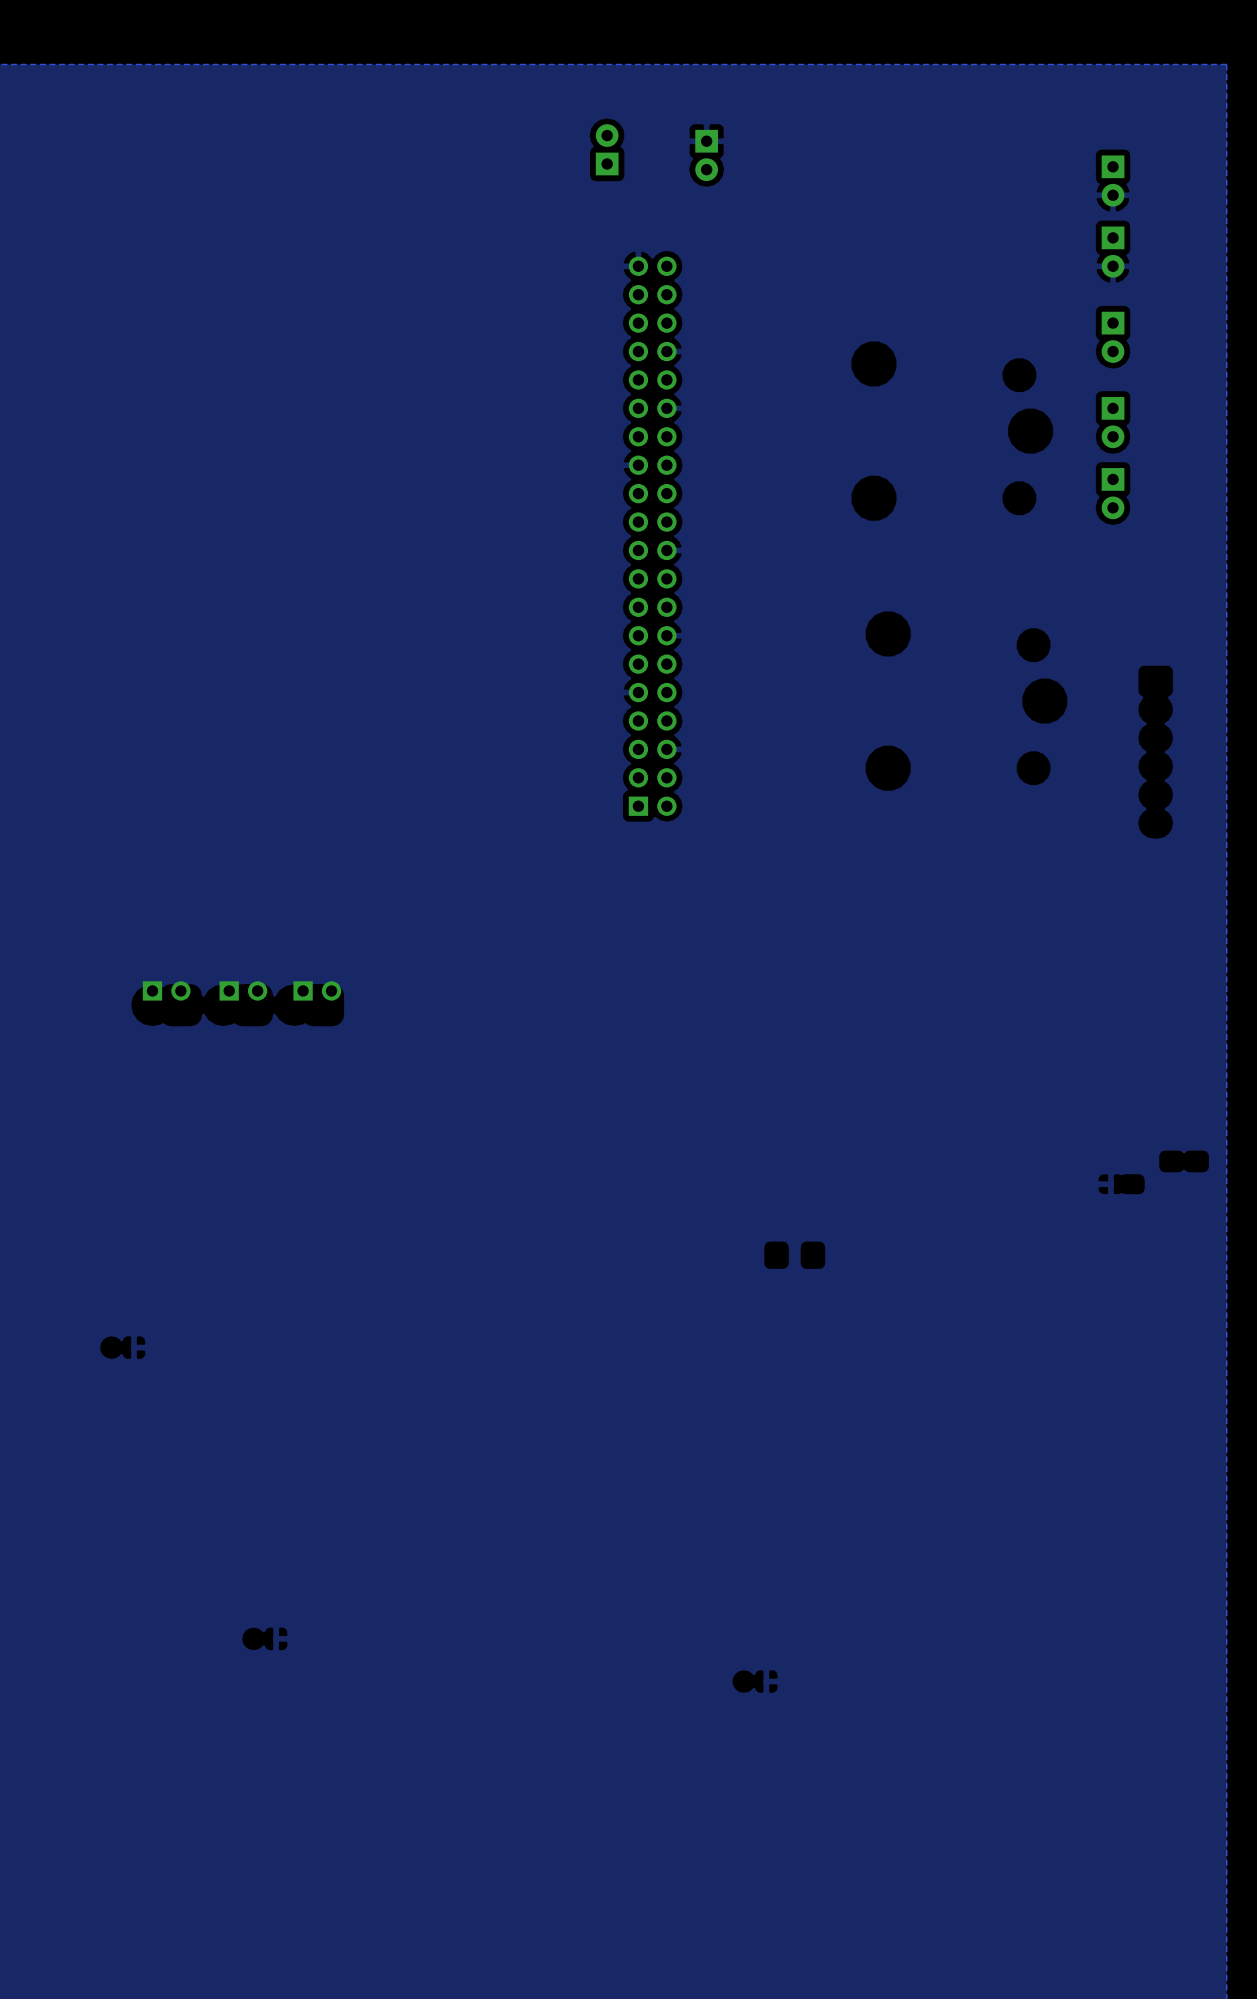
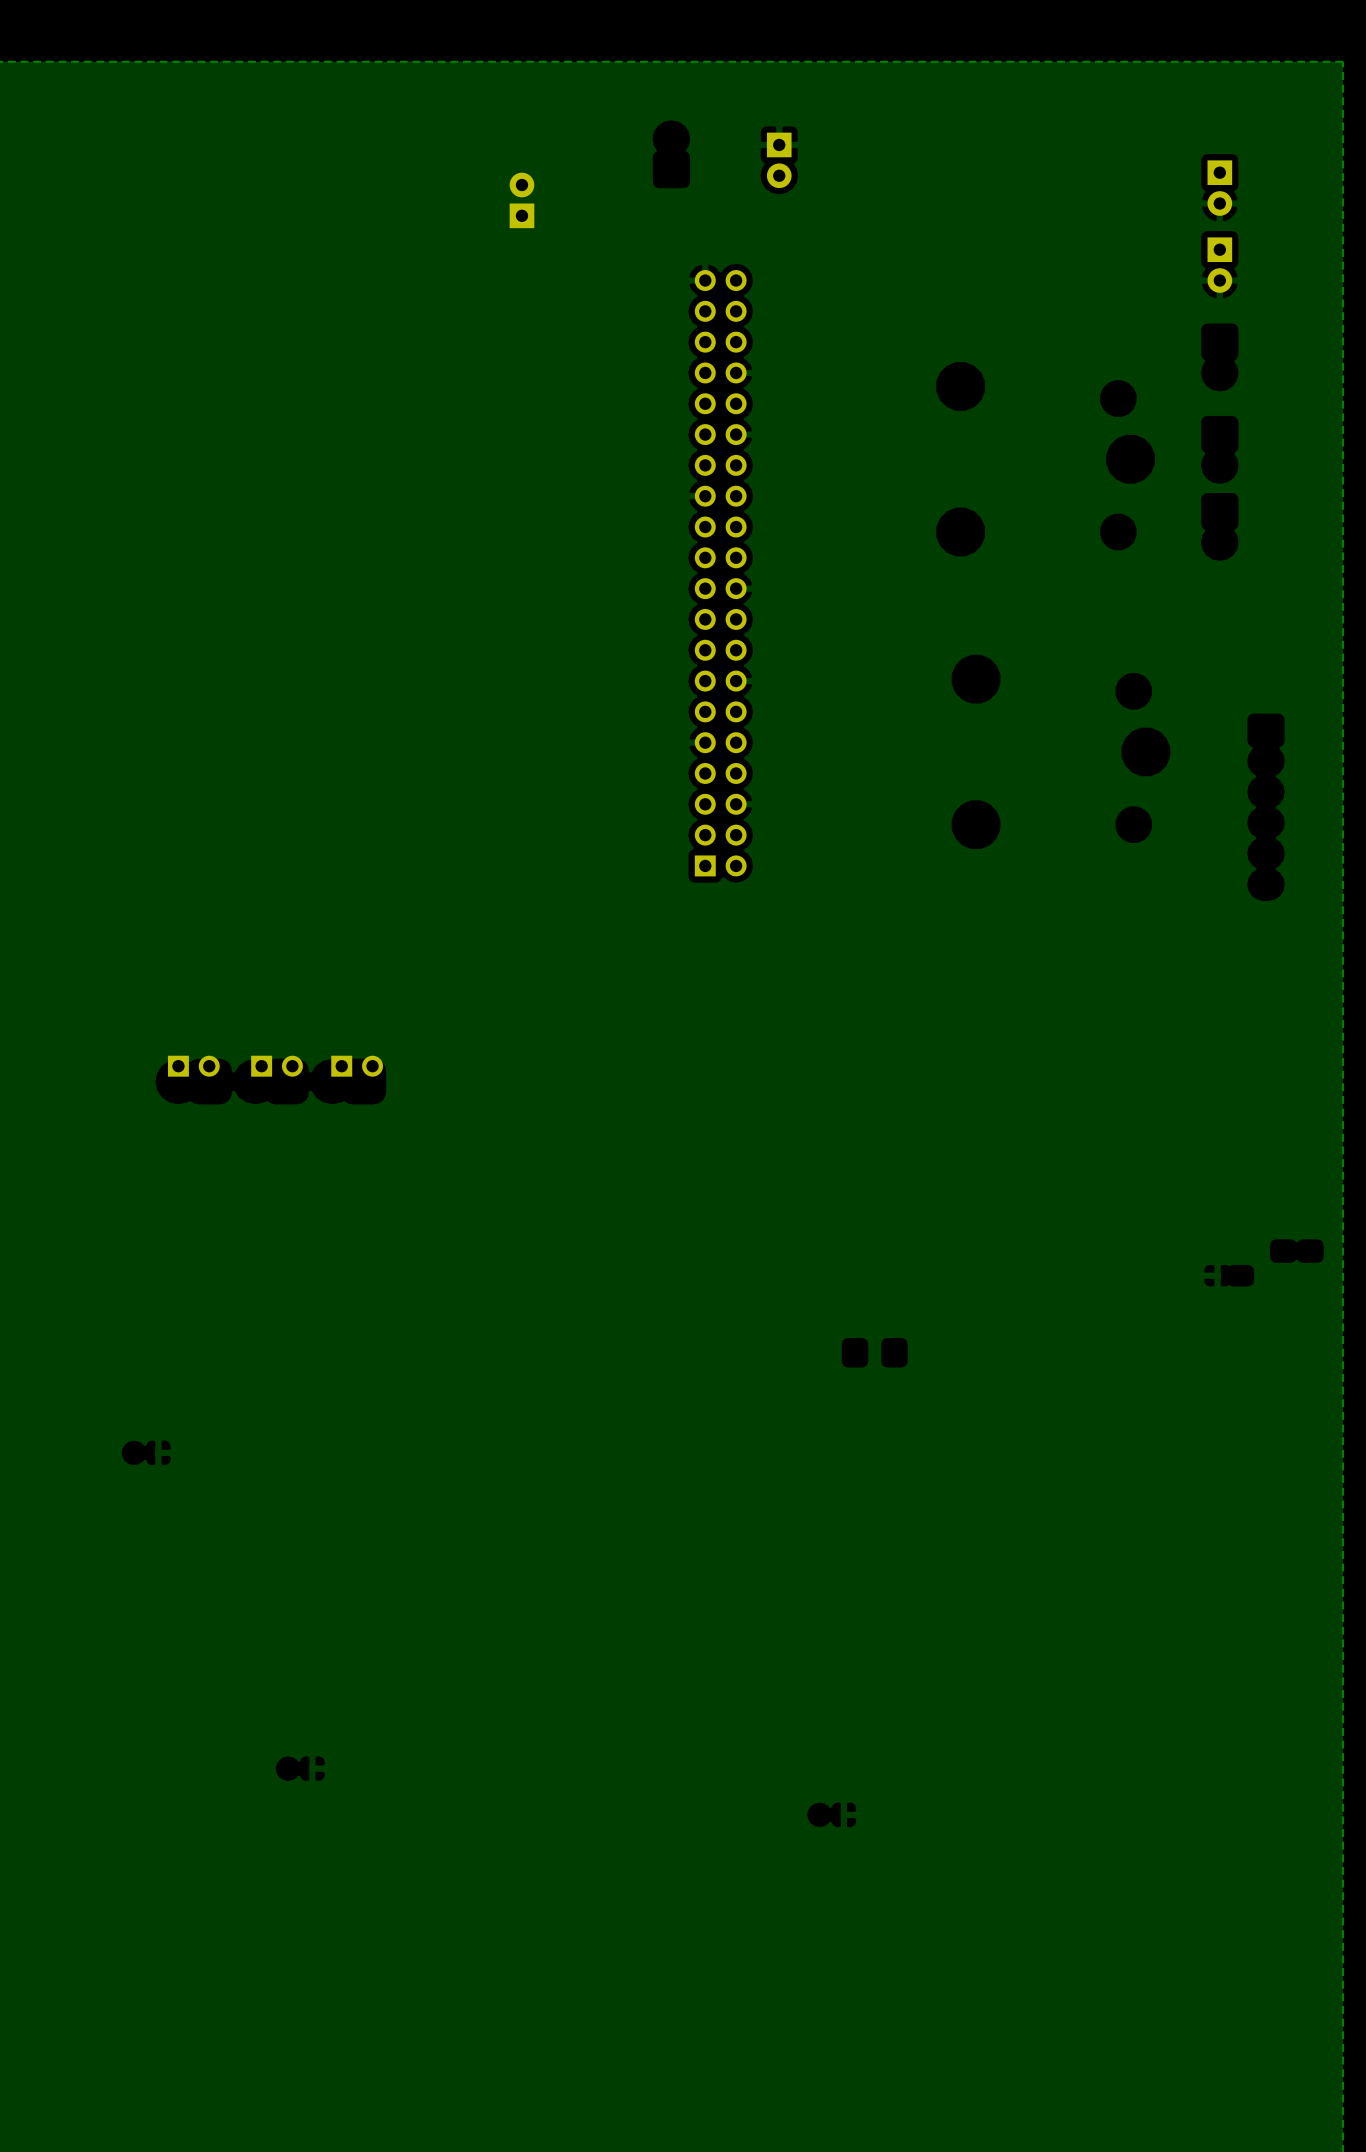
part position: (607, 149) -> (521, 200)
part: (1113, 337) -> none
part: (1113, 422) -> none
part: (1113, 493) -> none

